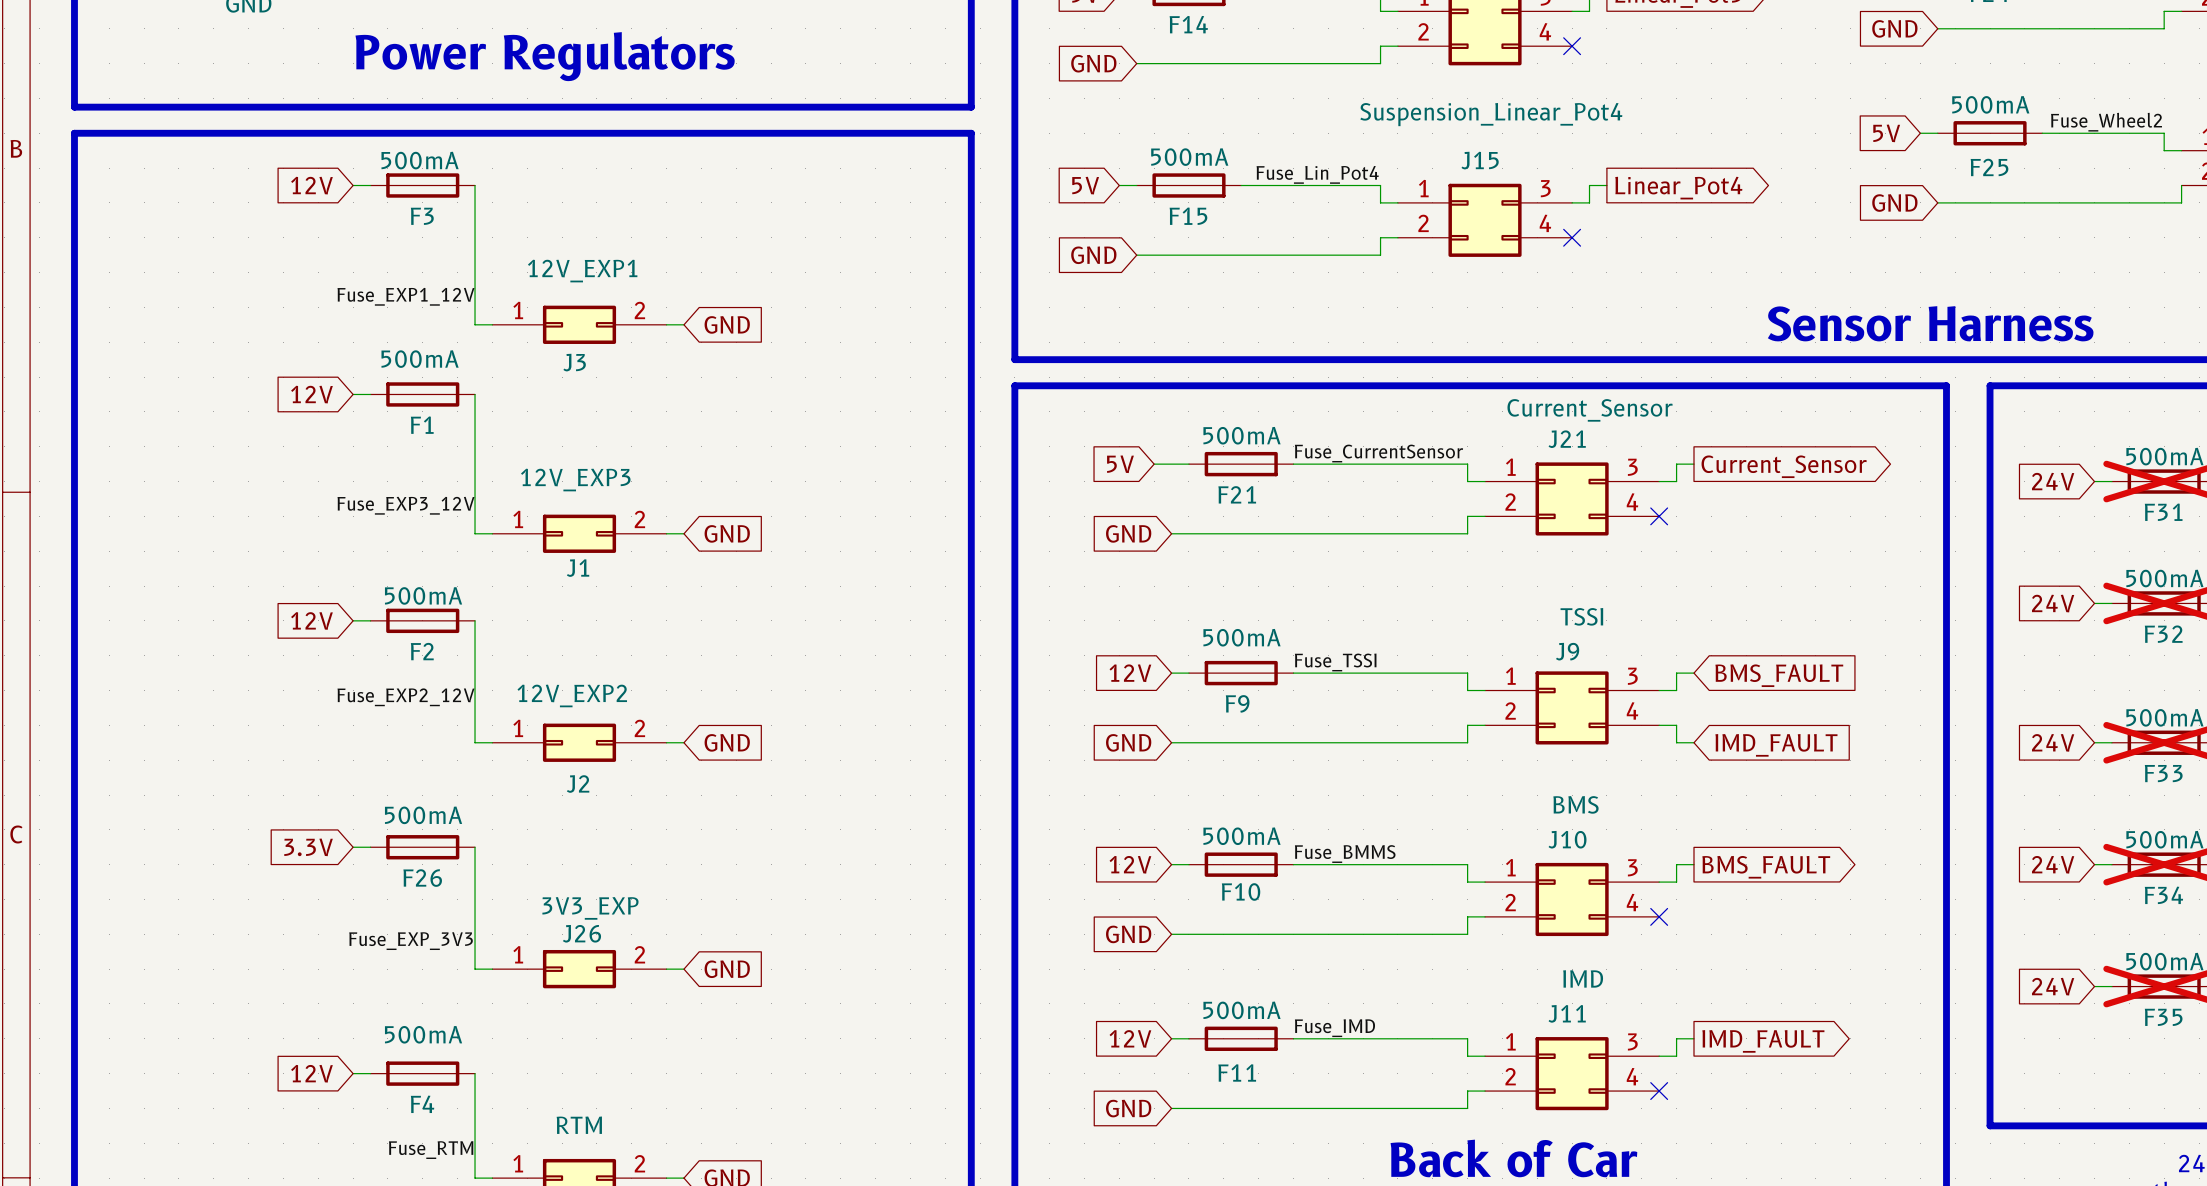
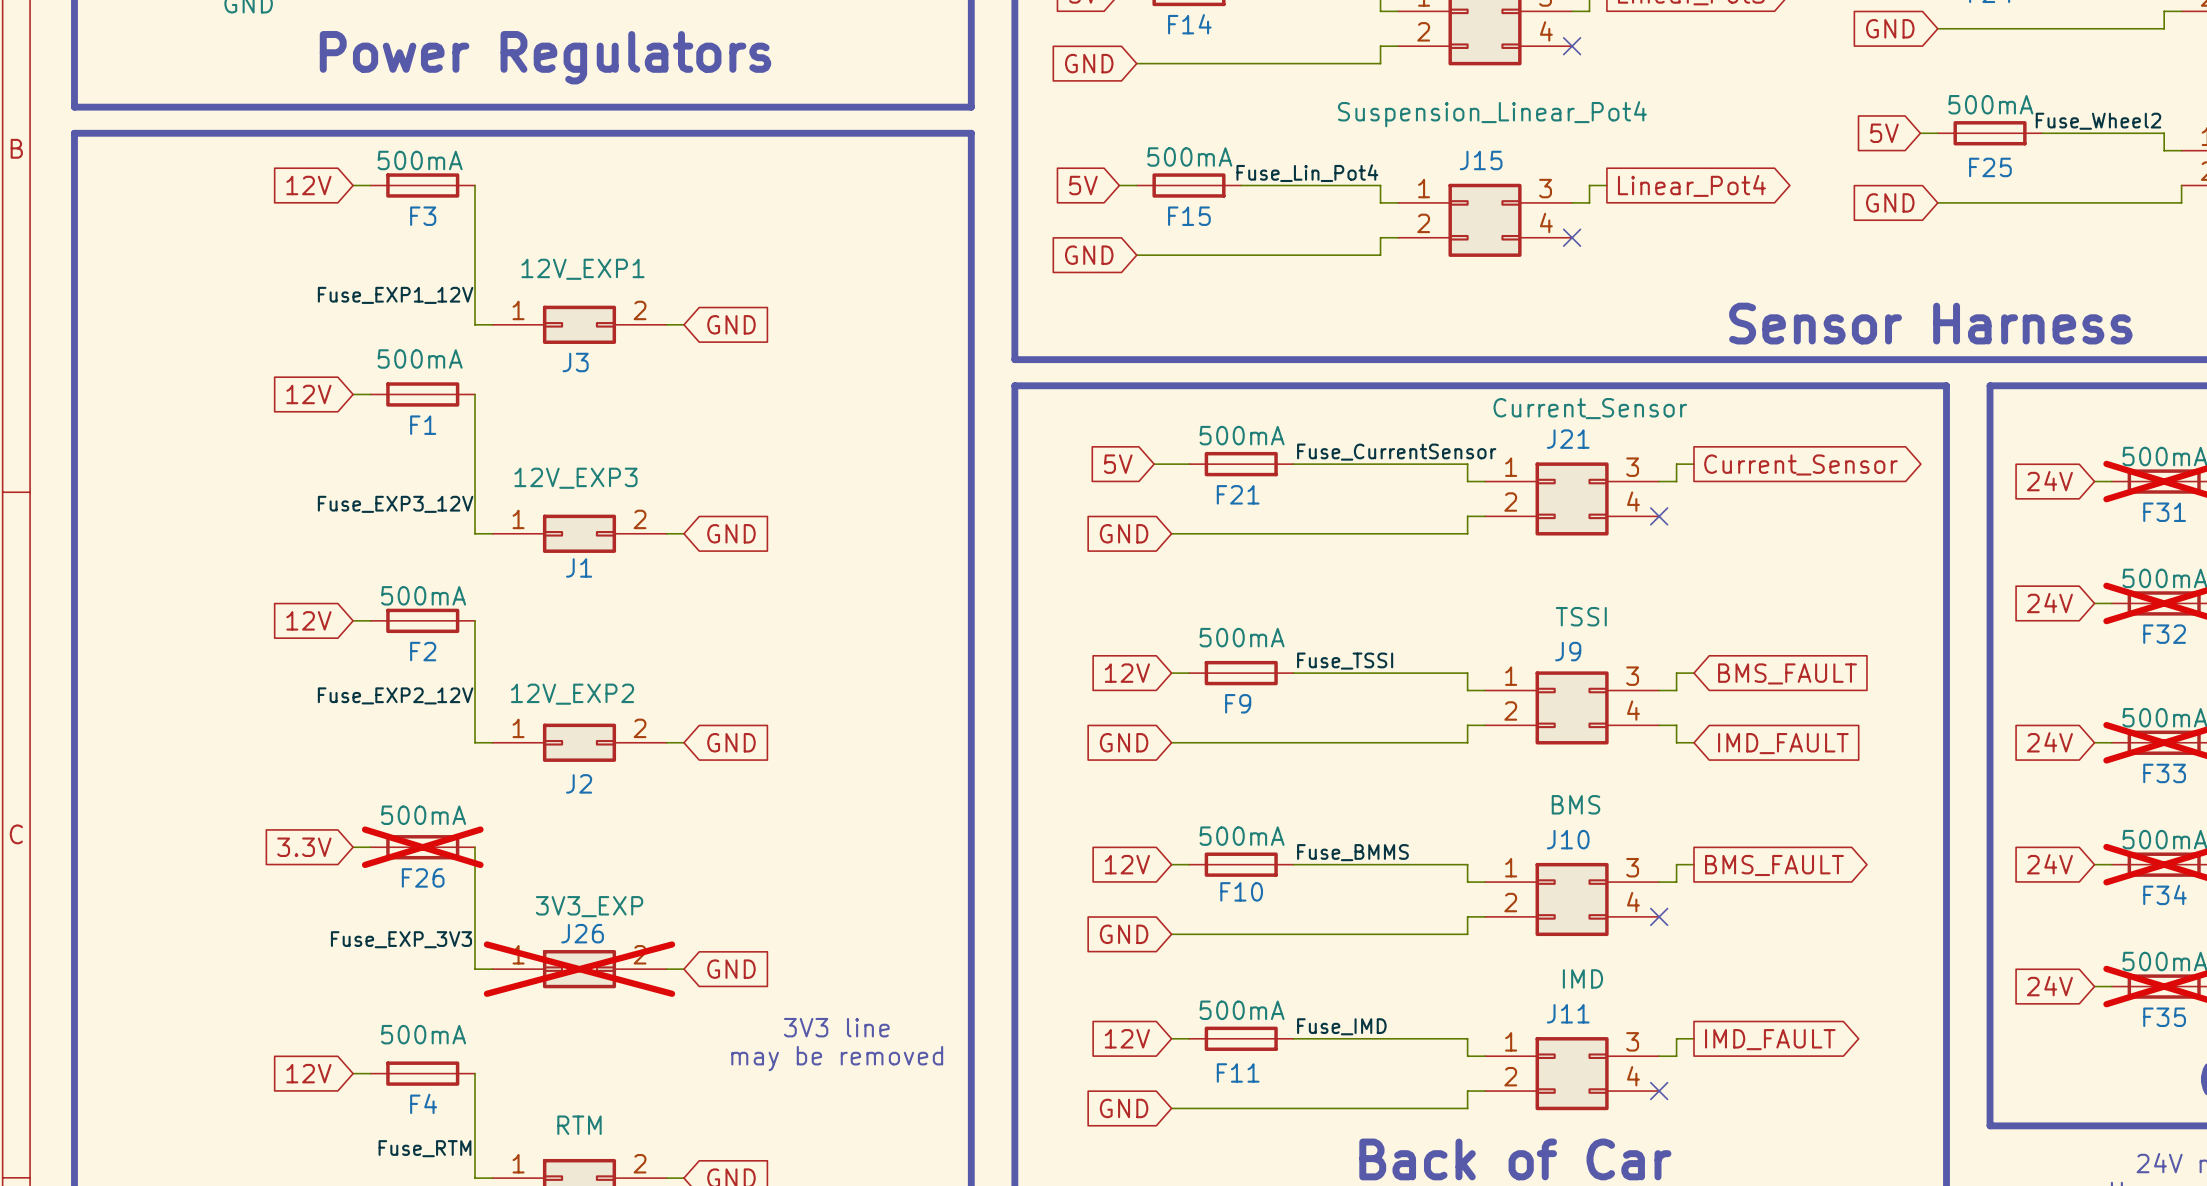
F26 do-not-place cross: none -> (422, 847)
J26 do-not-place cross: none -> (579, 969)
text: none -> 3V3 line (836, 1027)
text: none -> may be removed (837, 1058)

